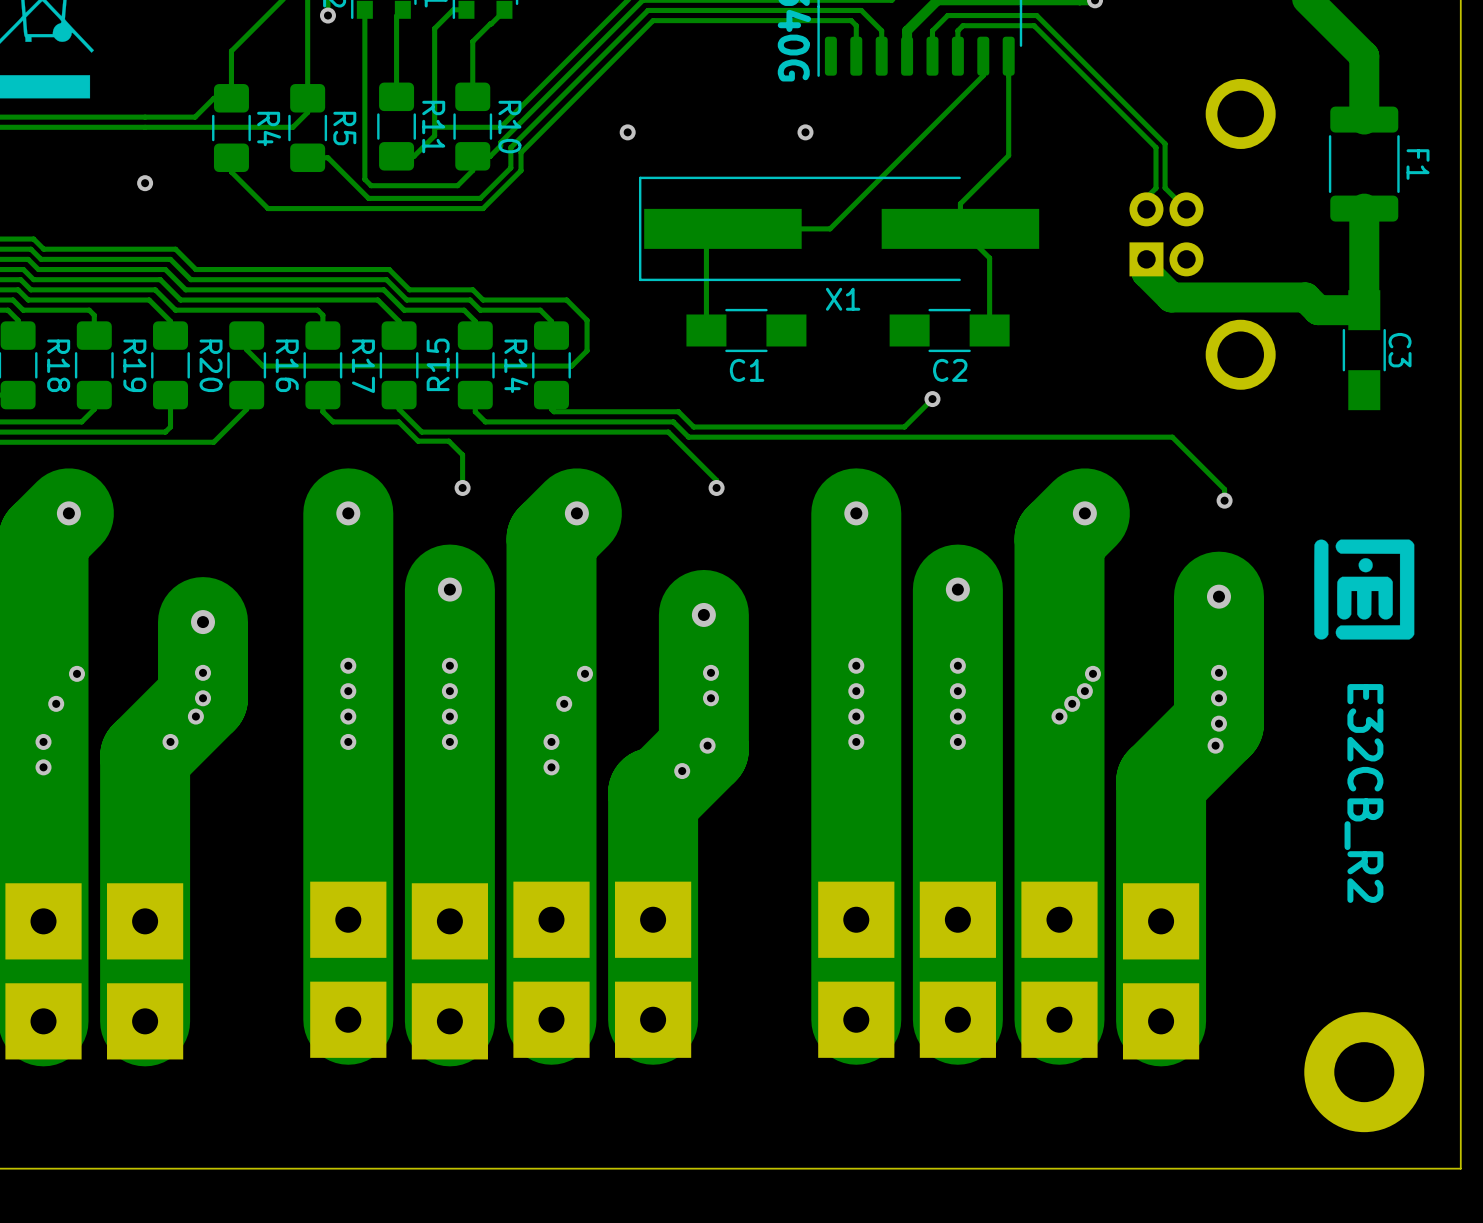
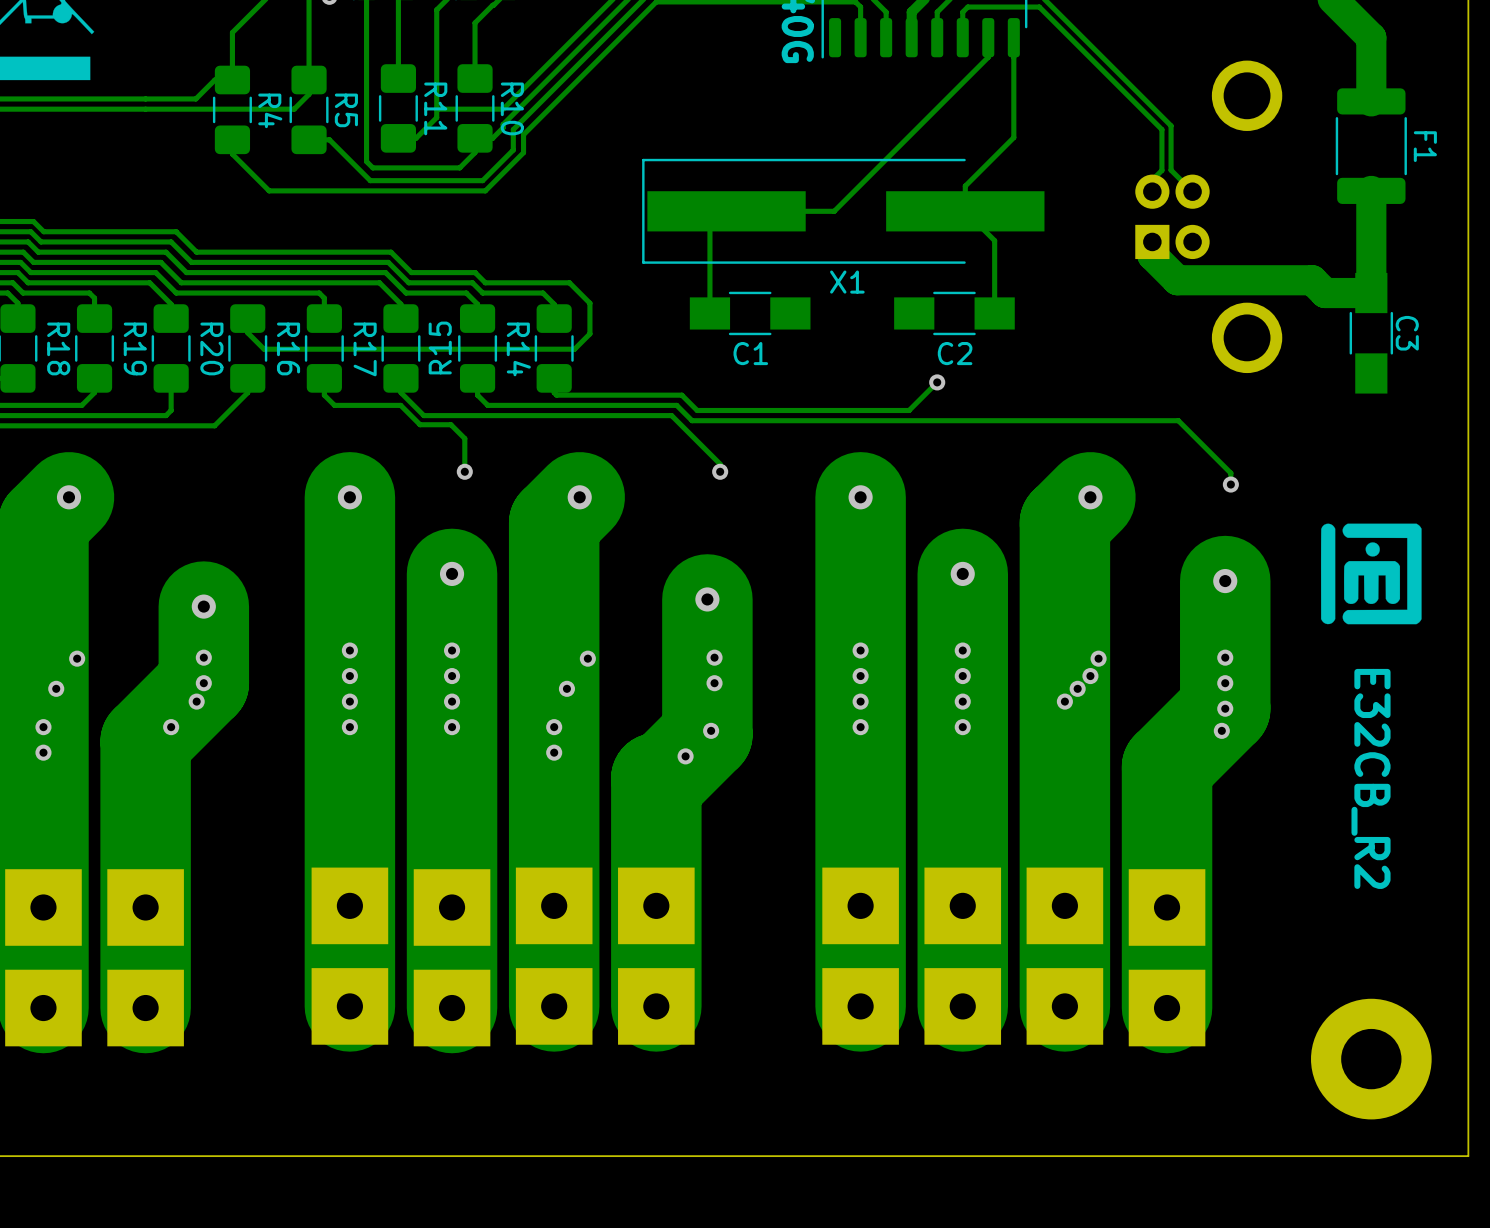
via: (627, 132) -> none
via: (805, 132) -> none
via: (145, 183) -> none

